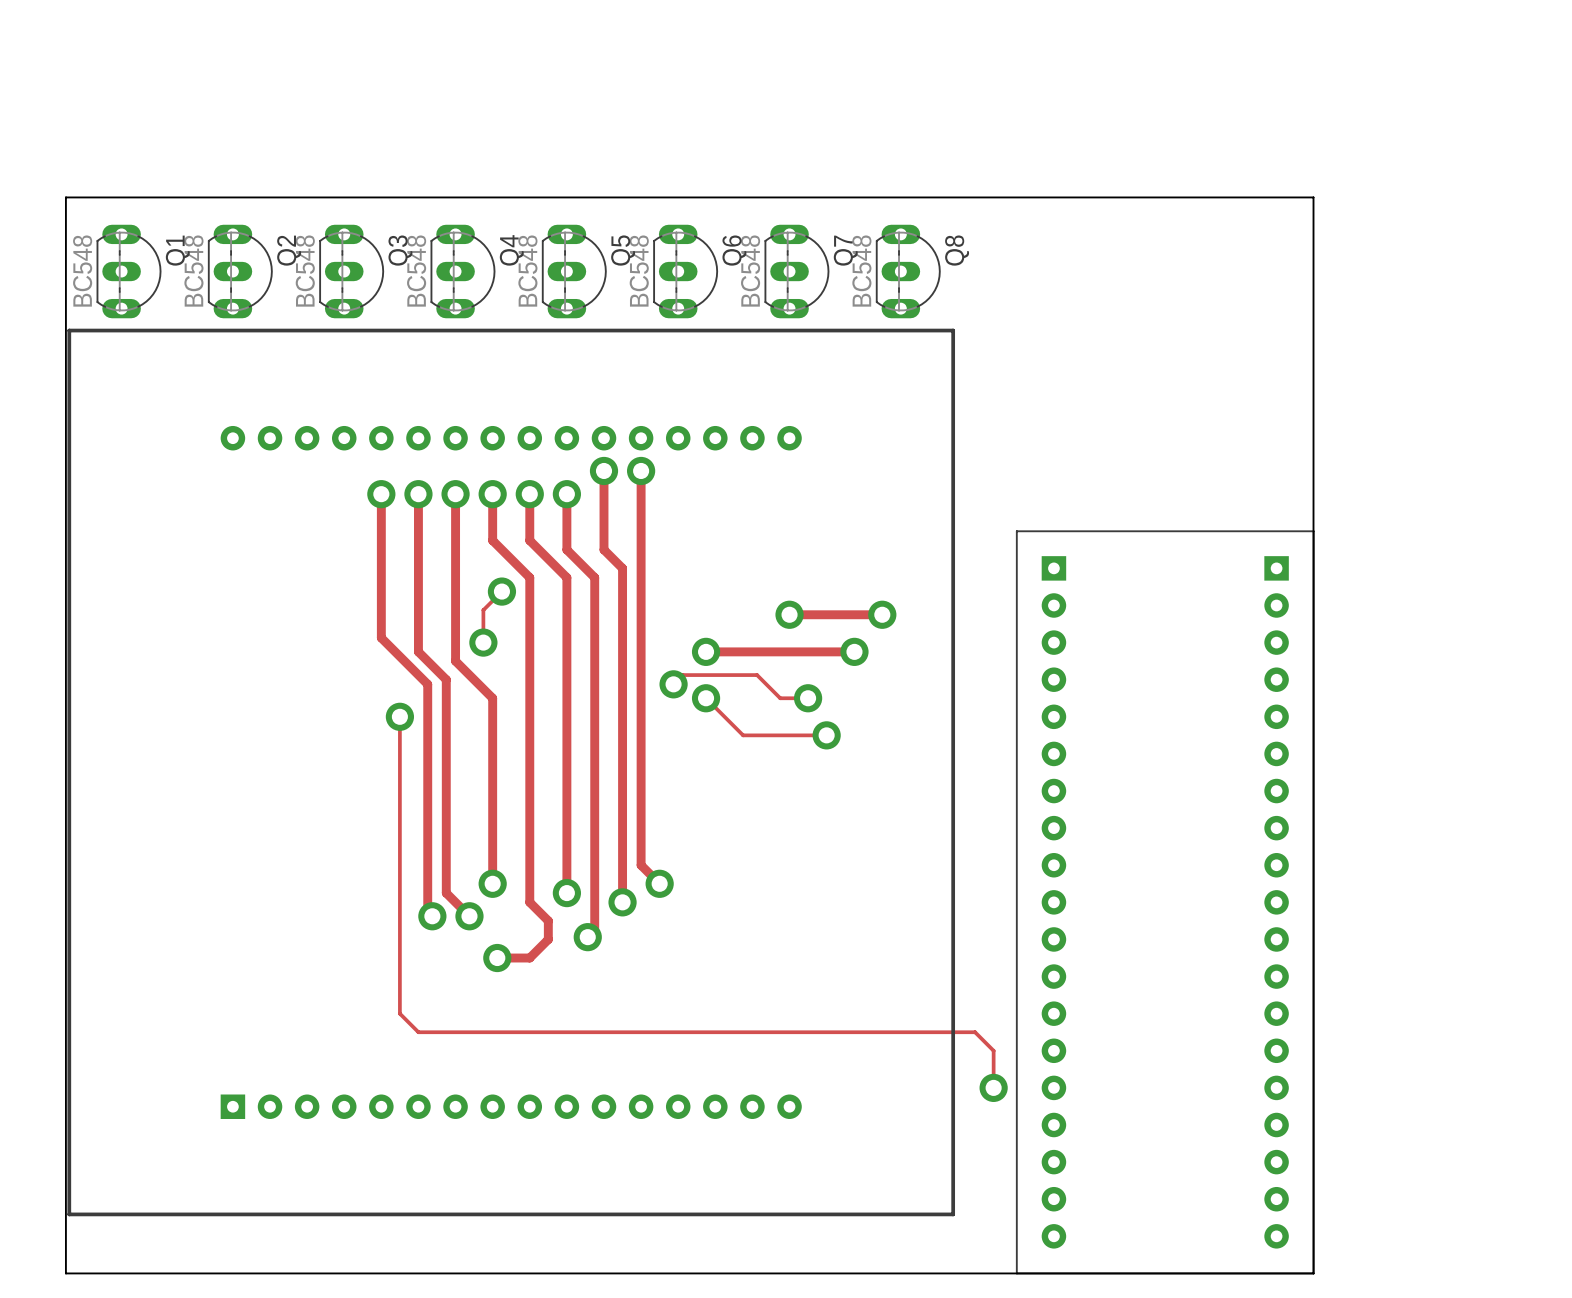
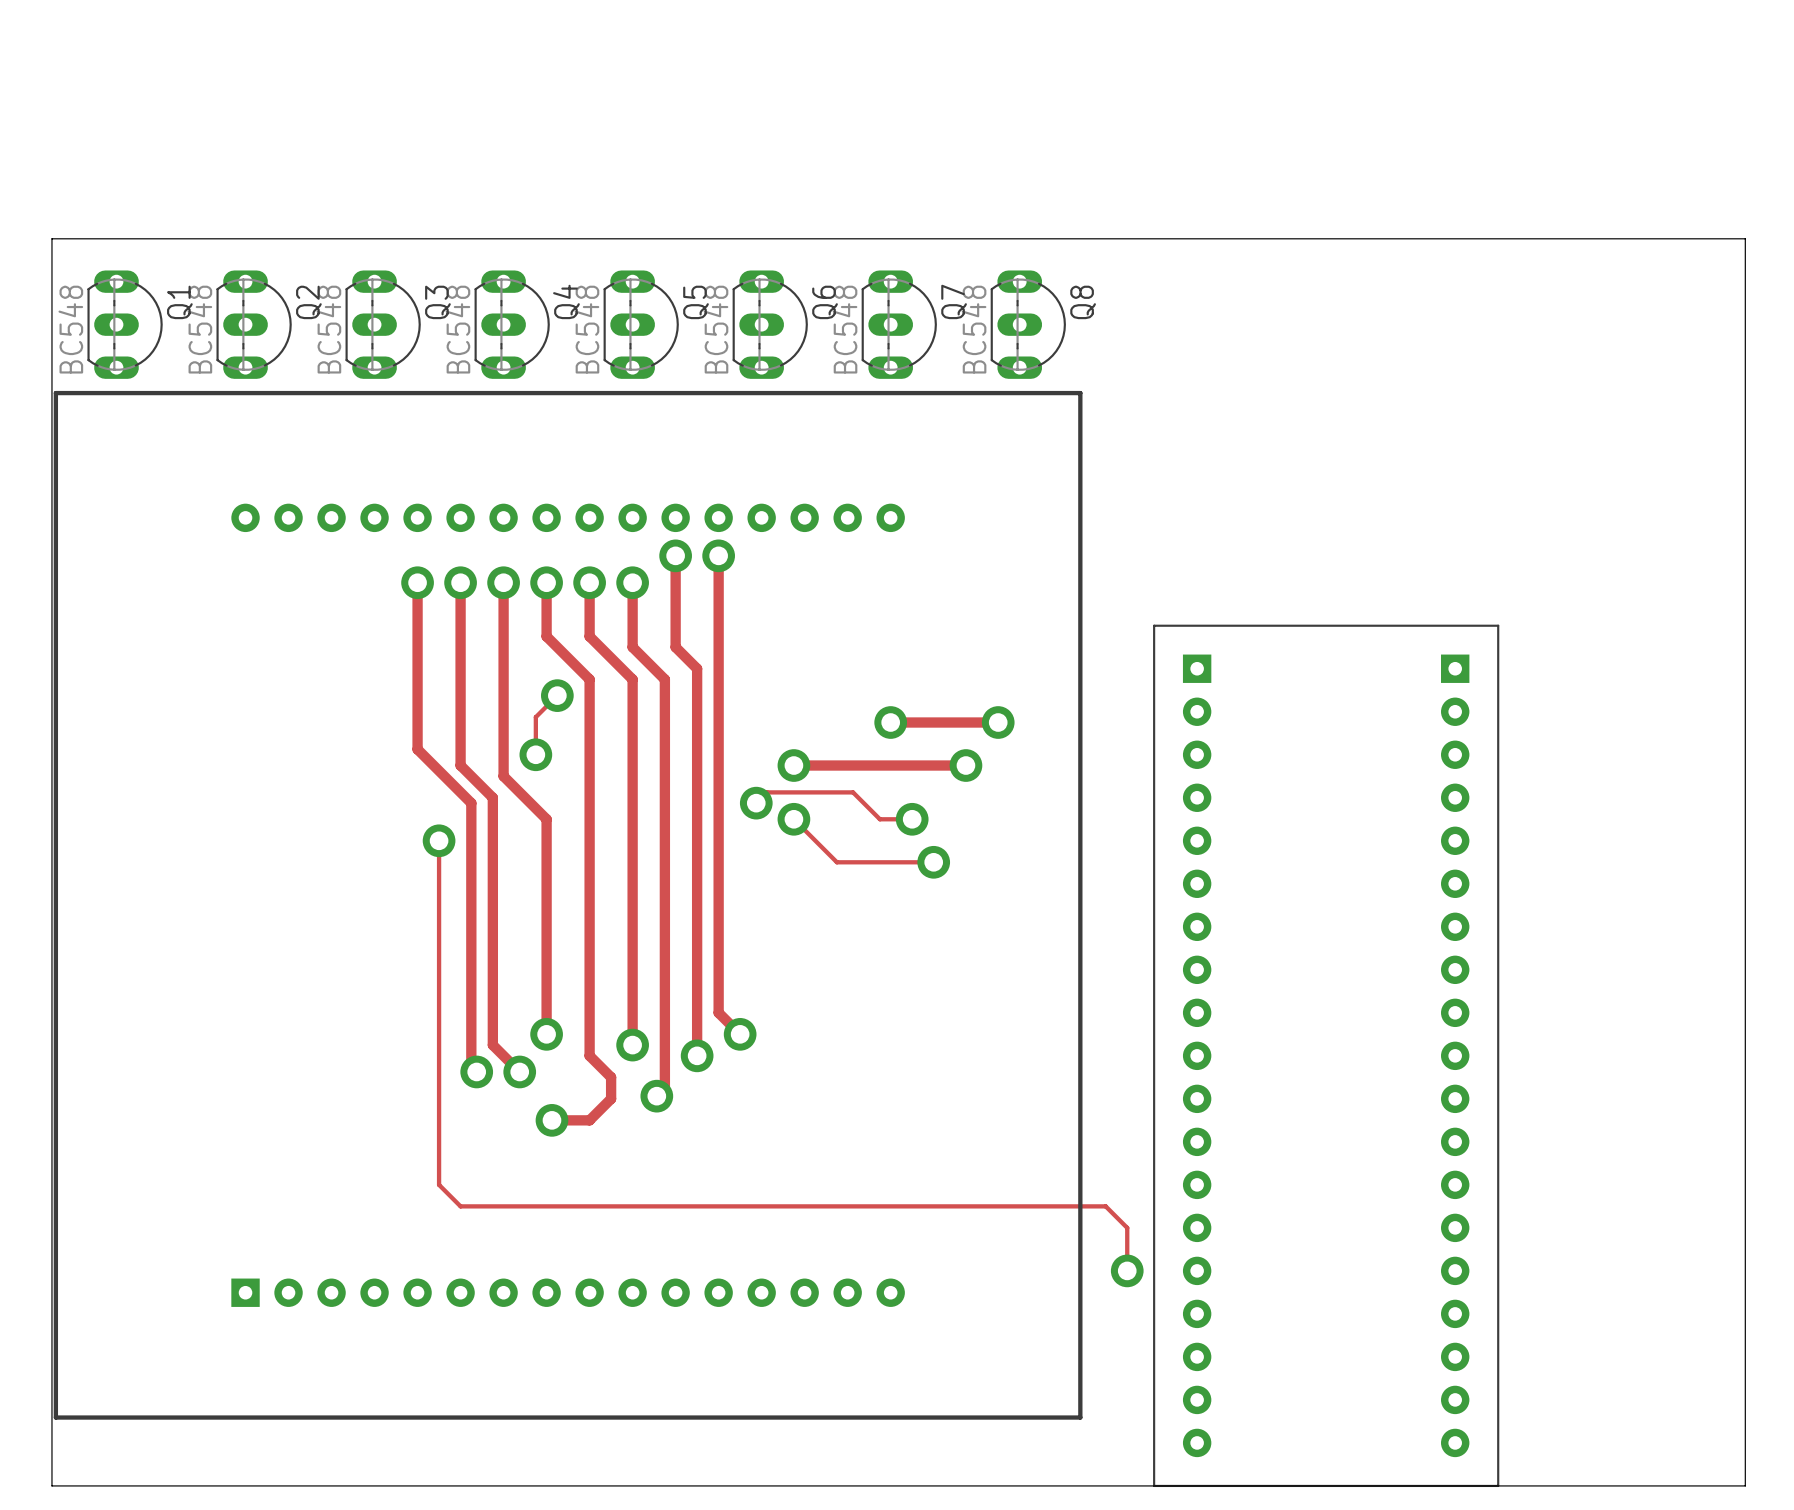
board edge: (1313, 197) (1313, 1273) -> (1498, 238) (1745, 238) (1745, 1485) (1498, 1485)

